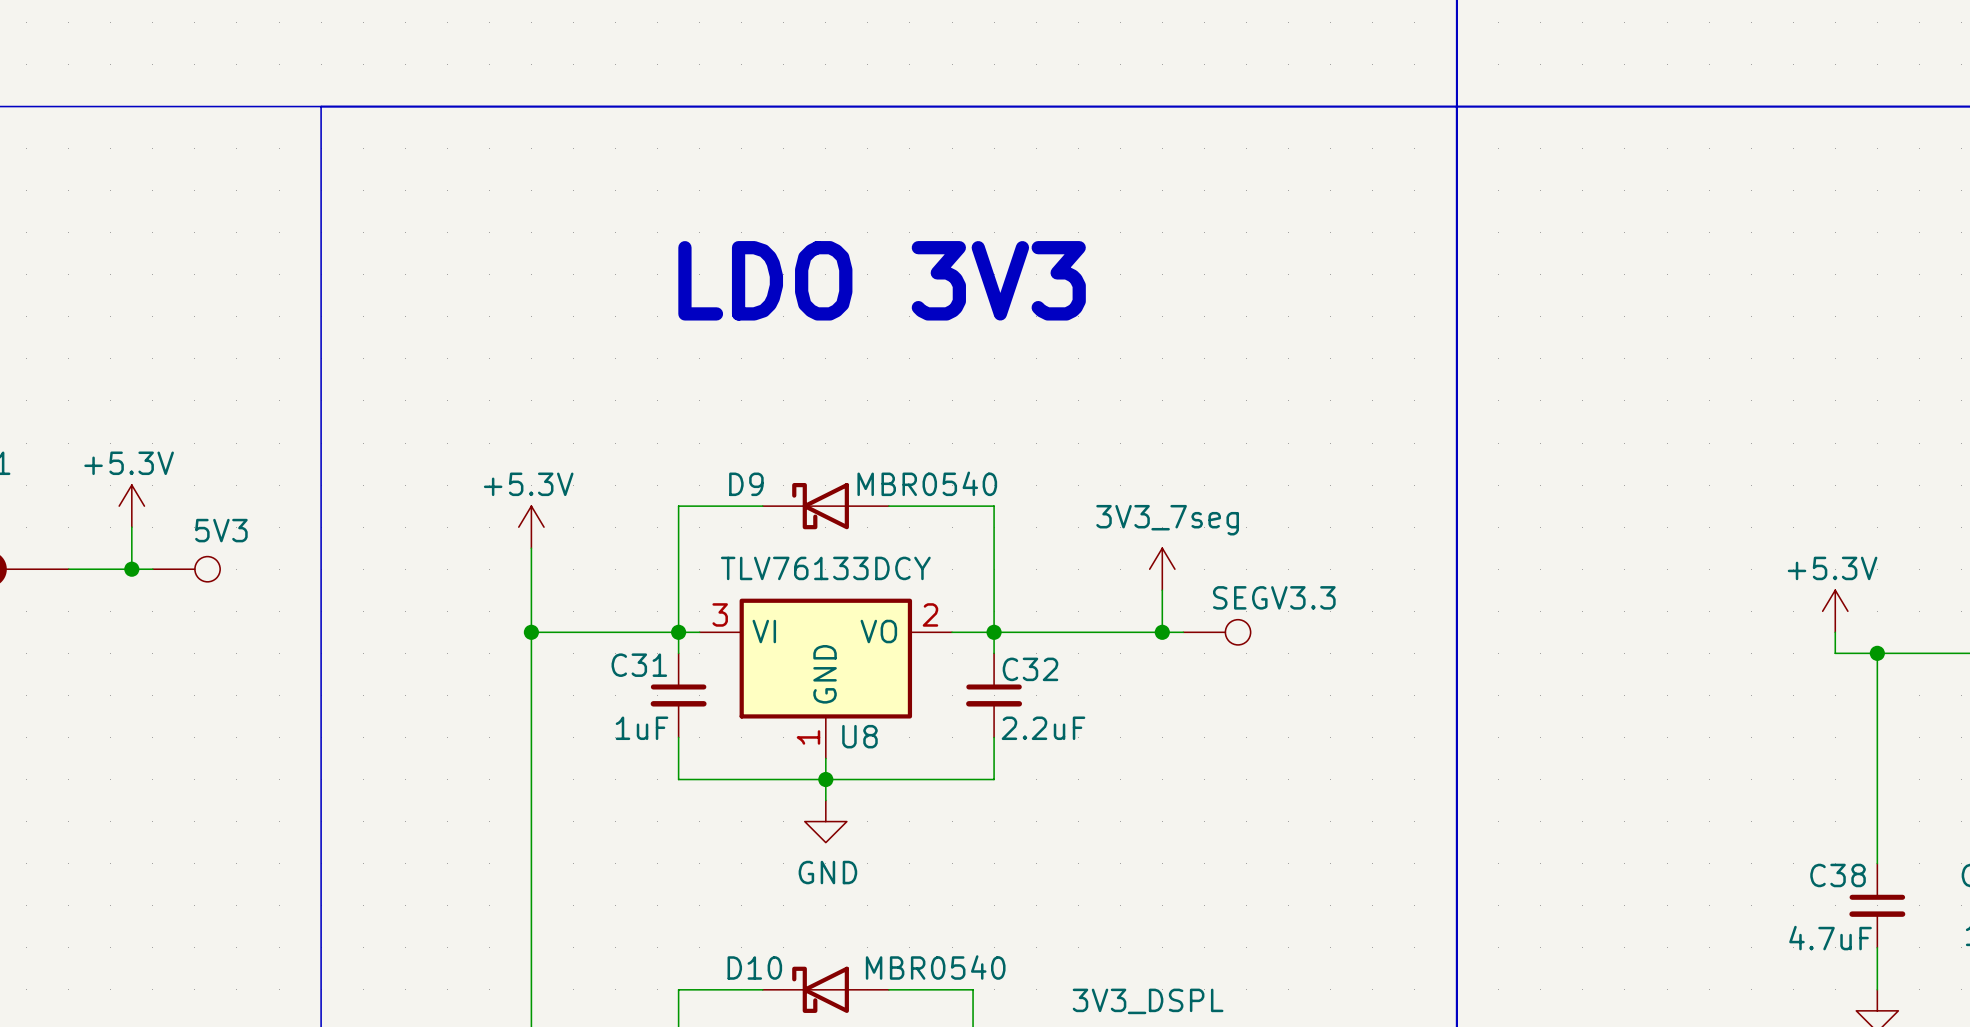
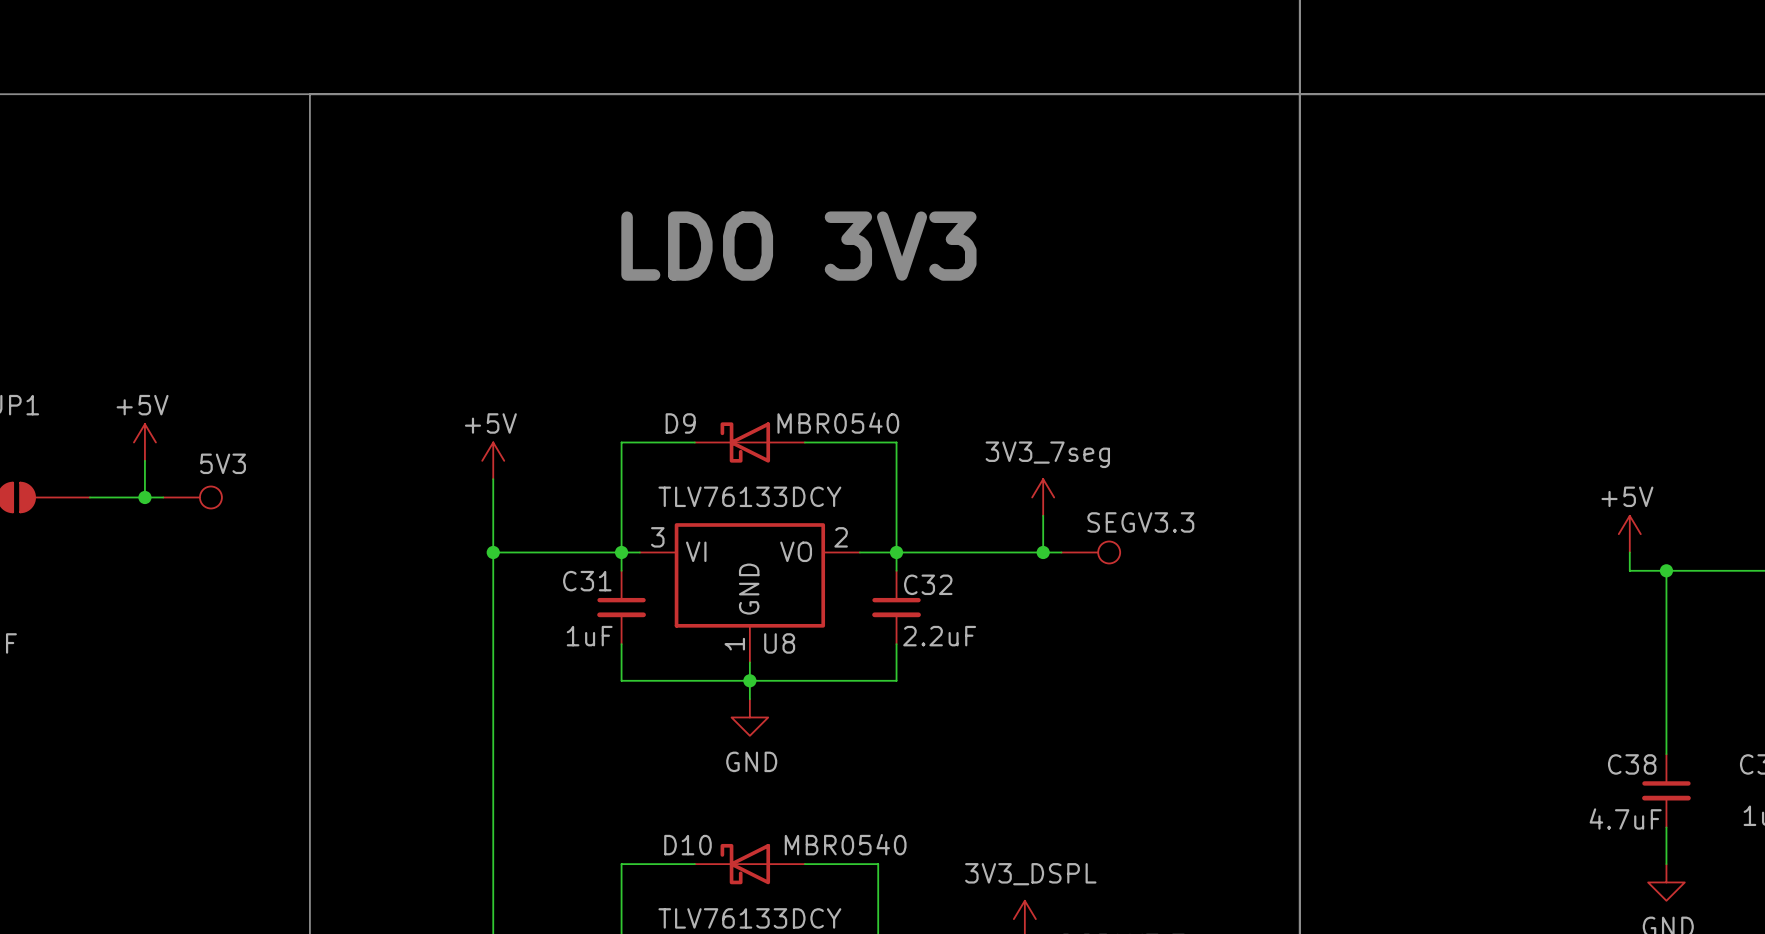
power symbol: +5.3V (131, 506) -> +5V (144, 442)
power symbol: +5.3V (531, 527) -> +5V (493, 460)
power symbol: +5.3V (1835, 611) -> +5V (1629, 534)

